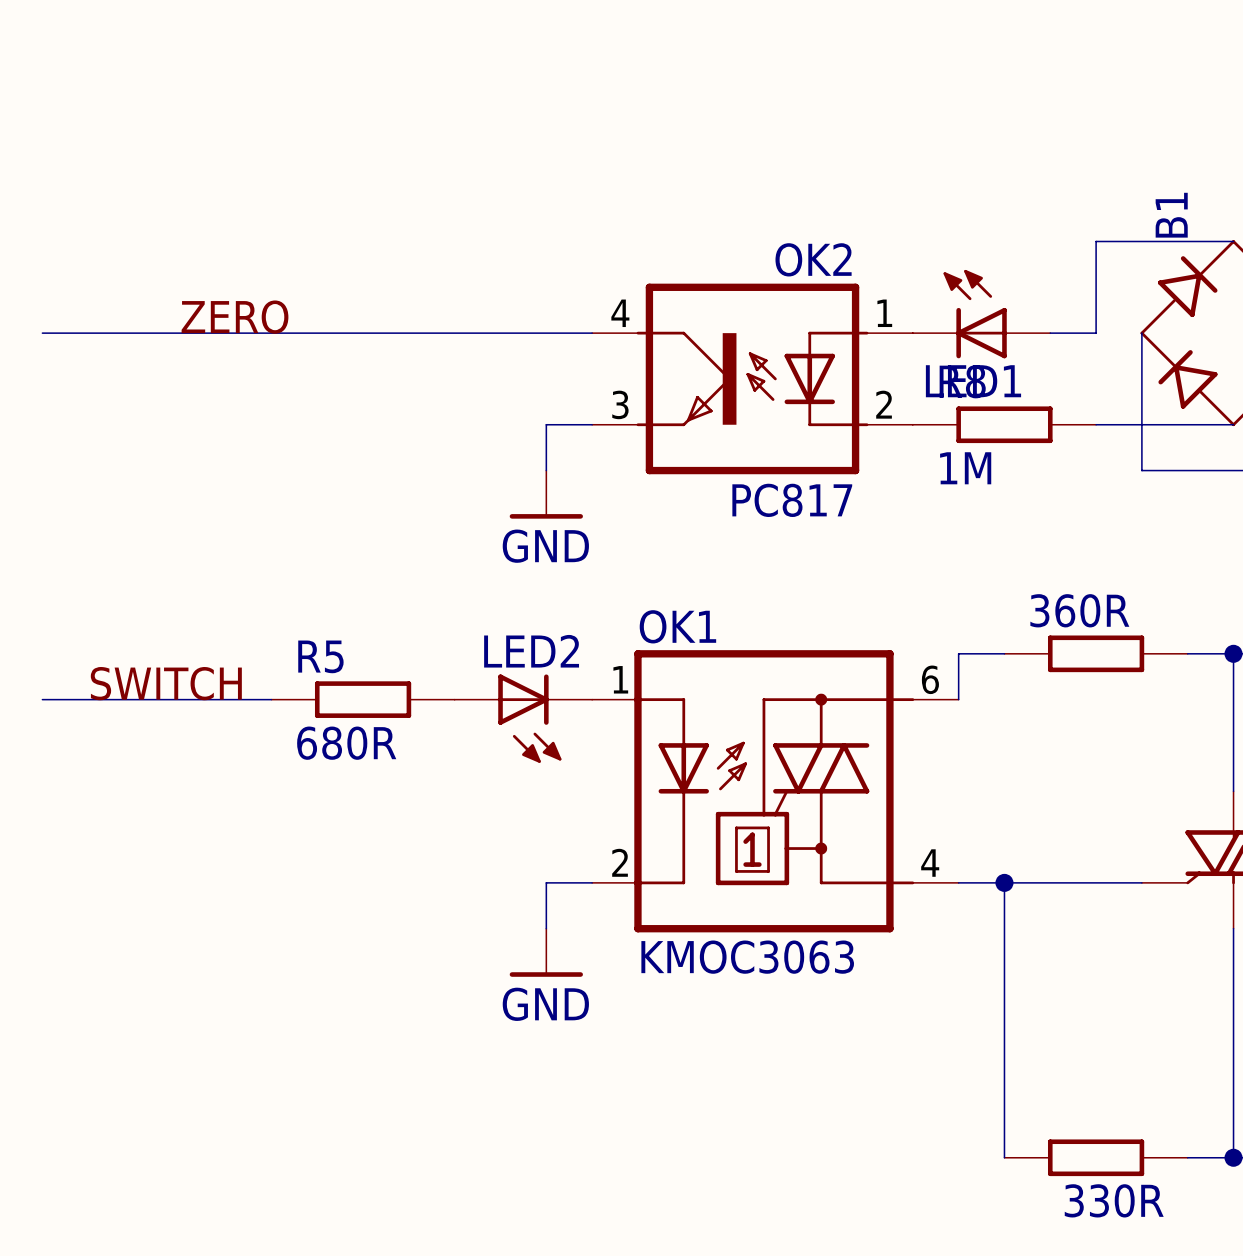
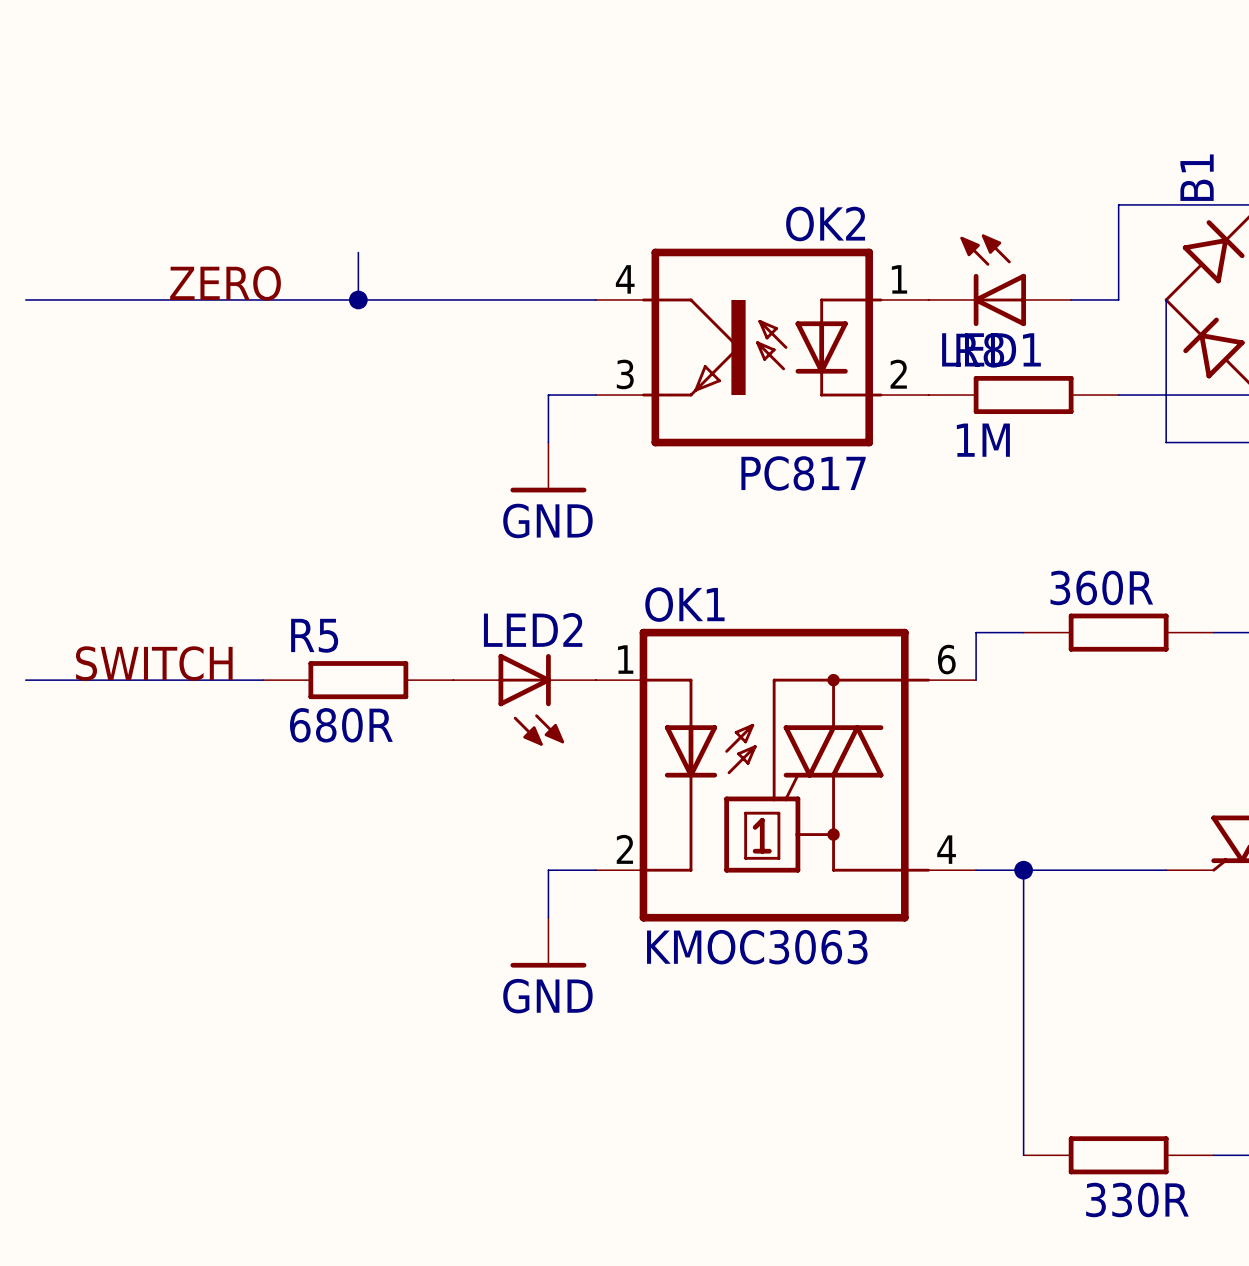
wire: none -> (358, 252) (358, 299)
junction: none -> (358, 299)

